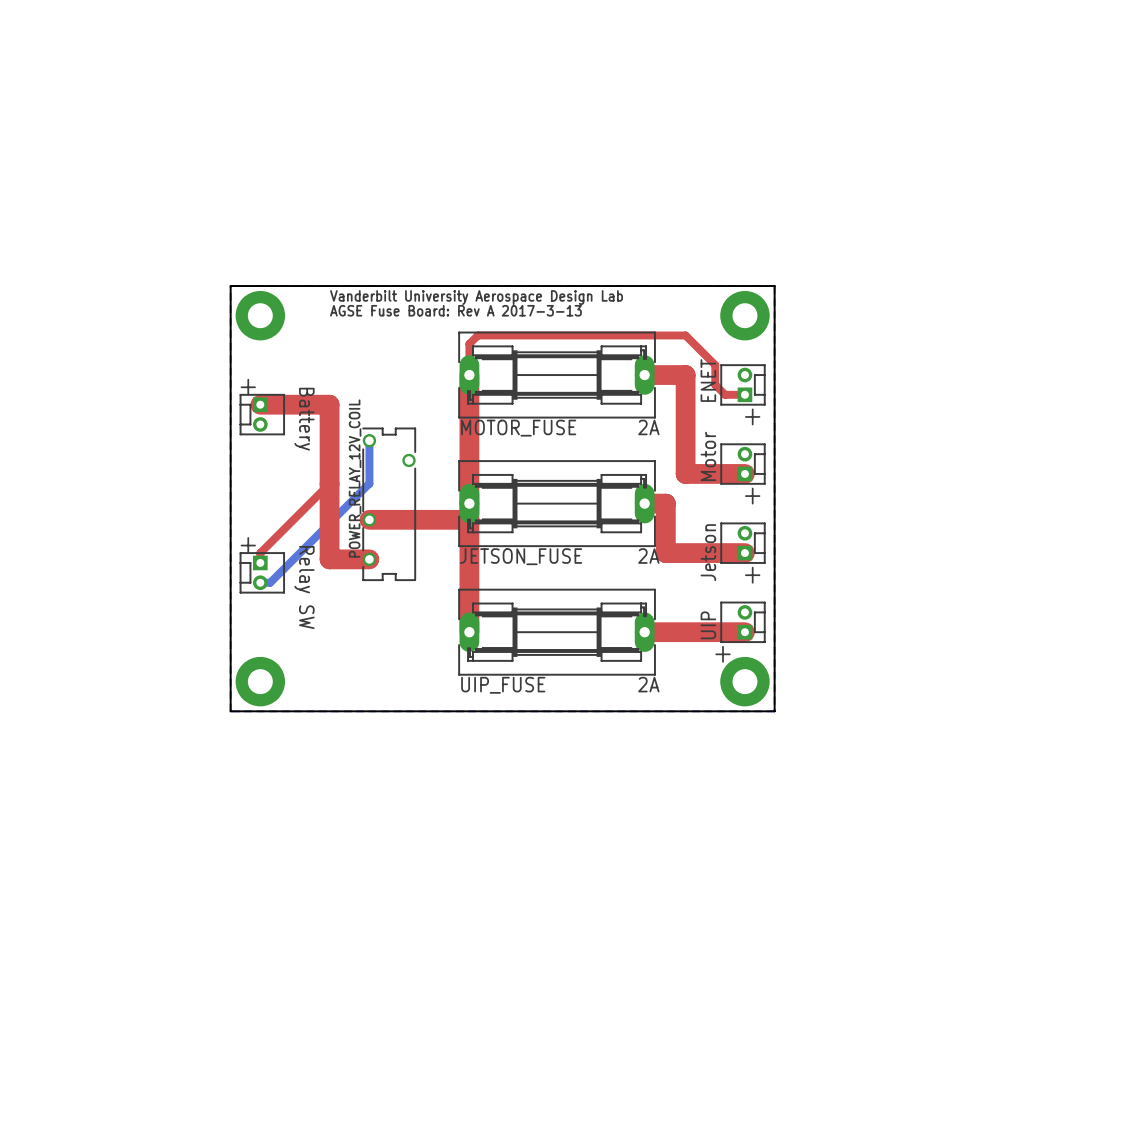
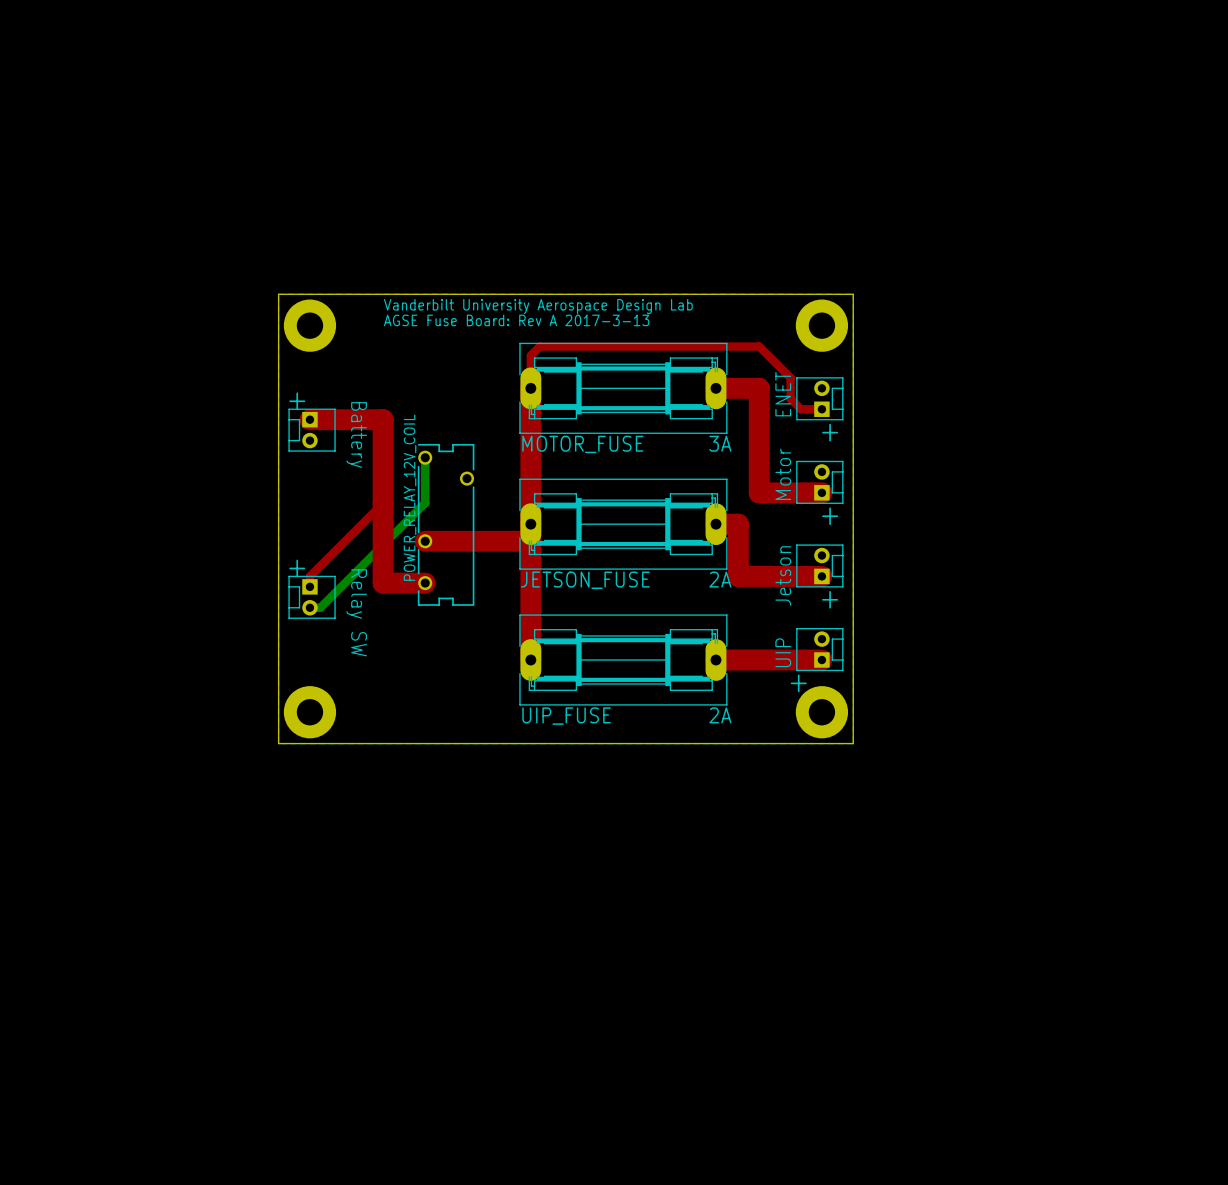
MOTOR_FUSE value: 2A (648, 427) -> 3A (720, 443)

